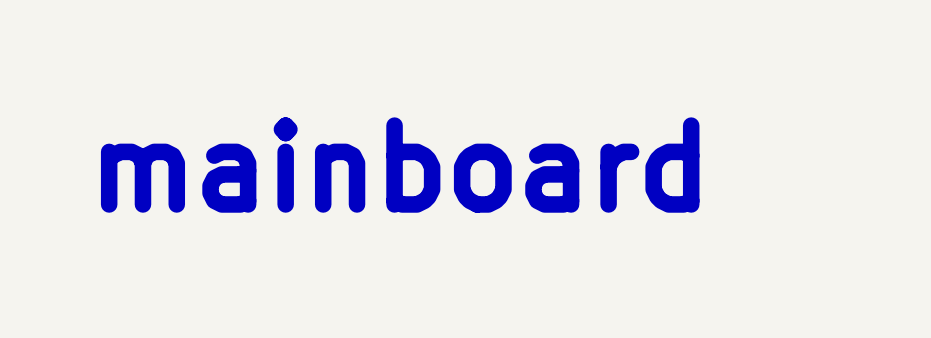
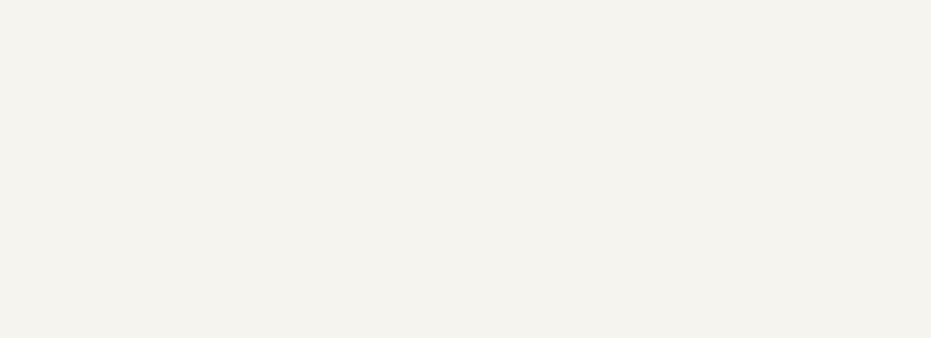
text: mainboard (400, 165) -> none

